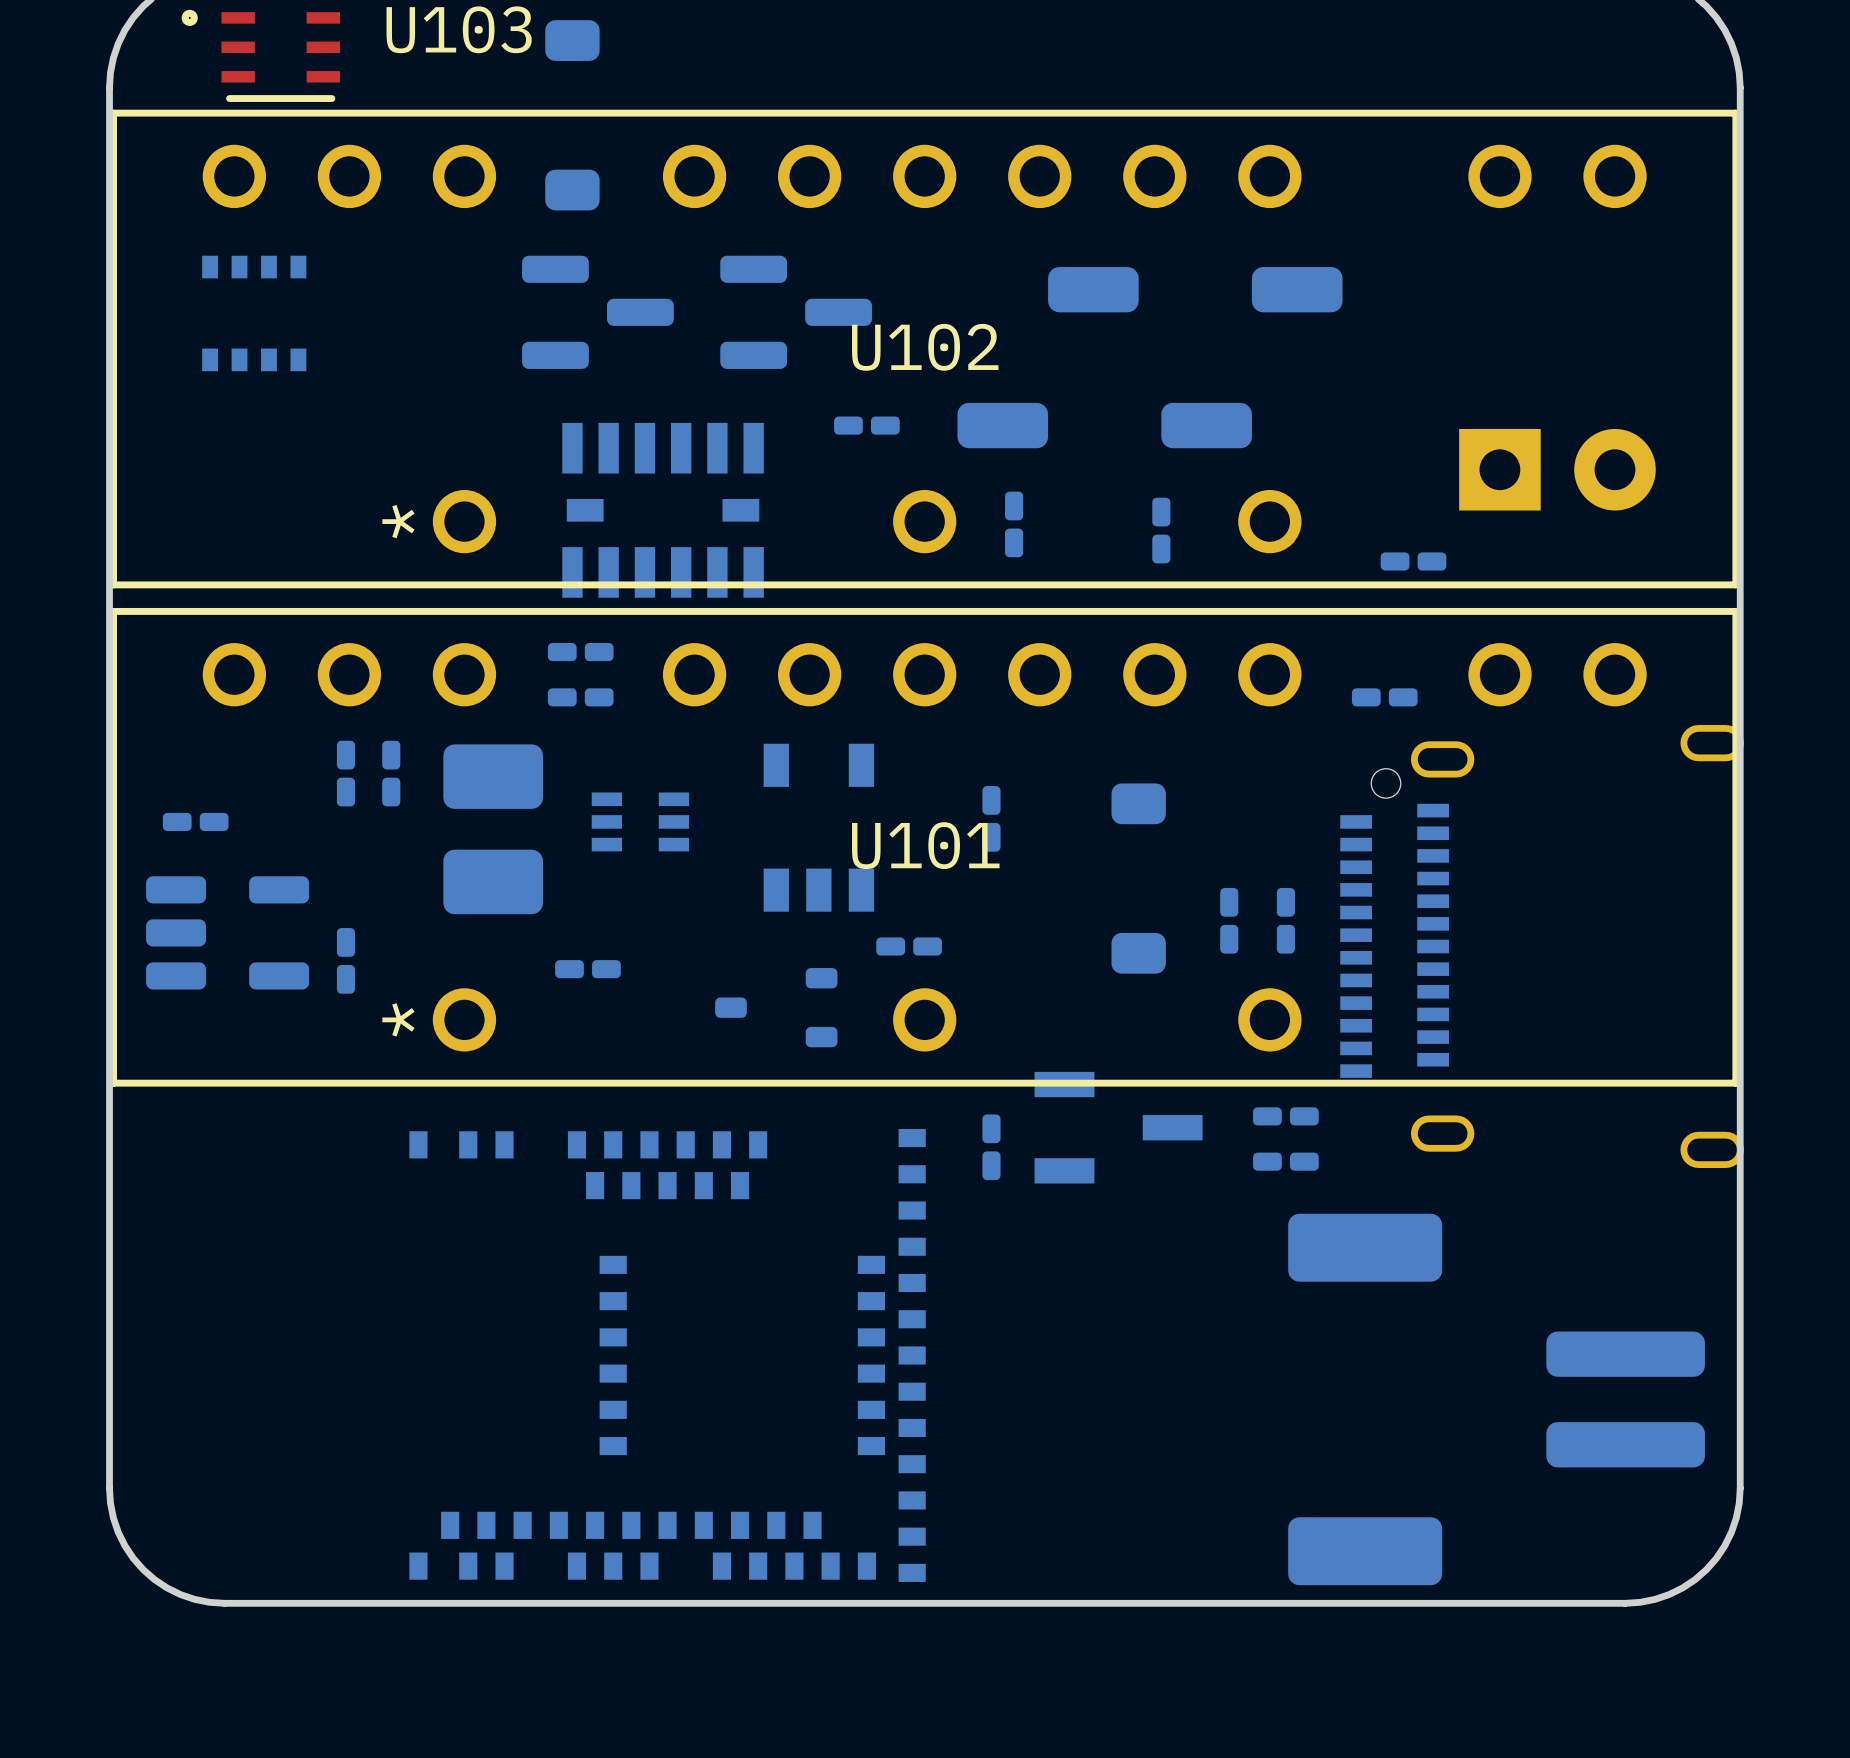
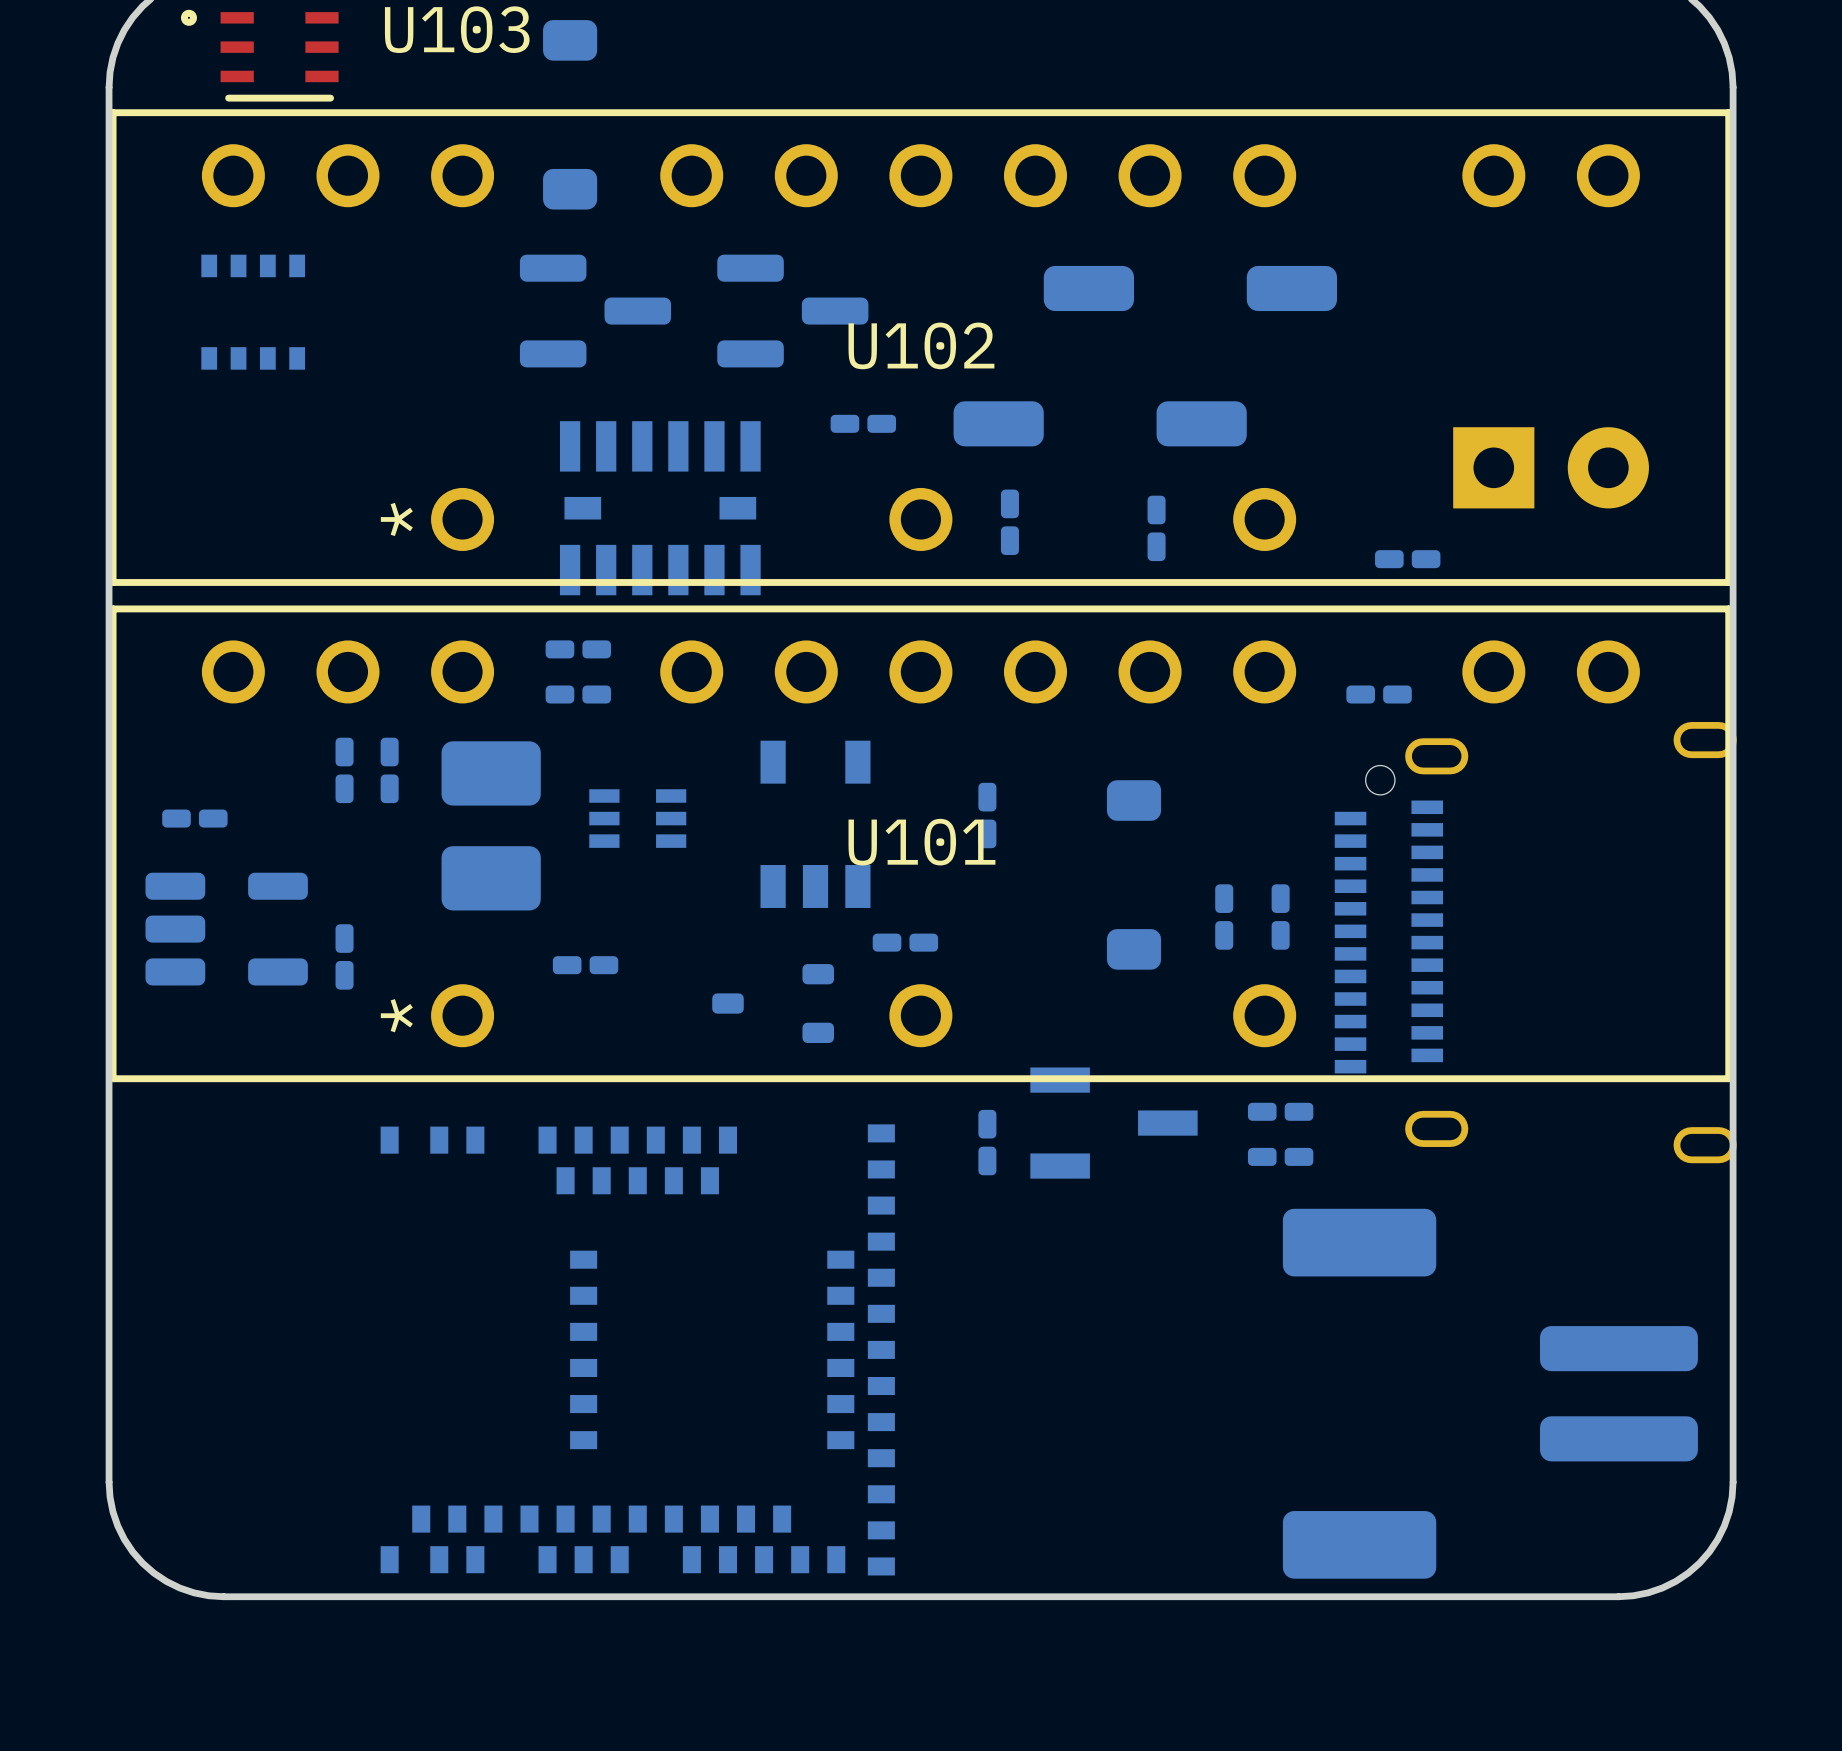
part position: (667, 1355) -> (637, 1349)

